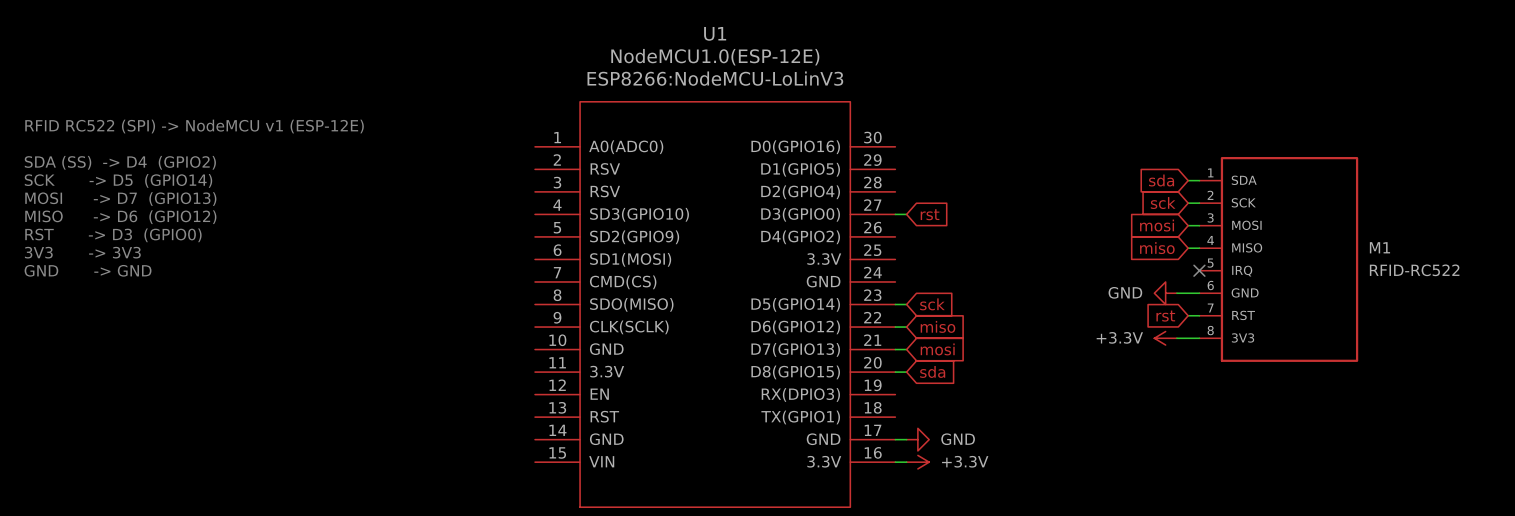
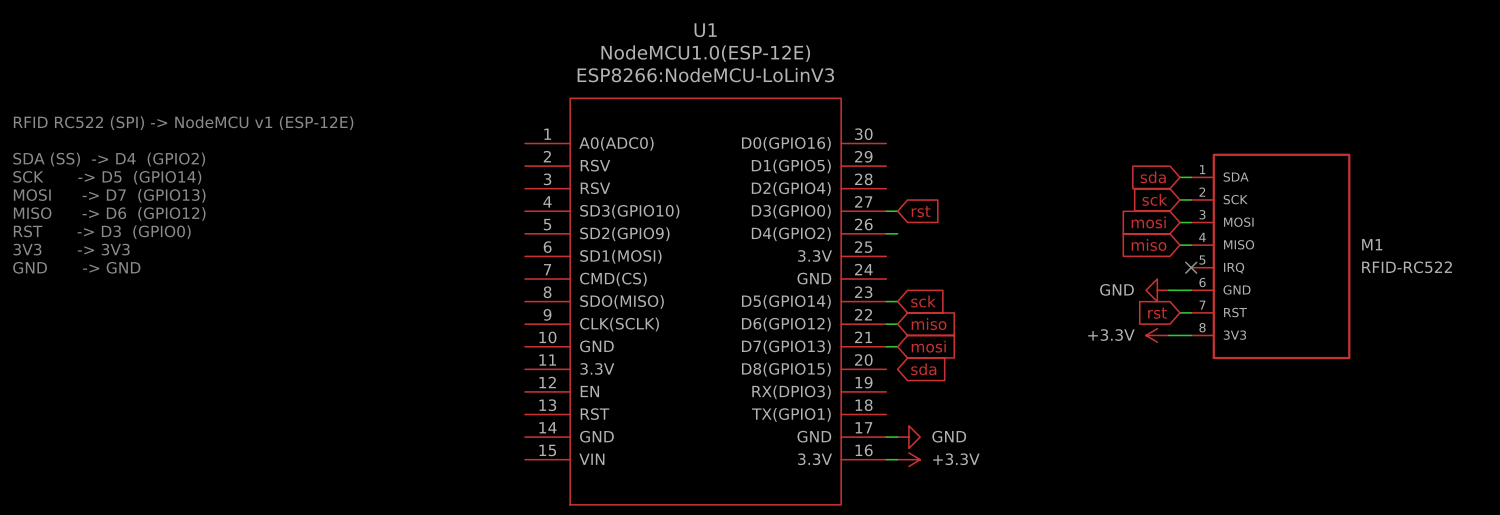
wire: (895, 372) (906, 372) -> (886, 233) (897, 233)

